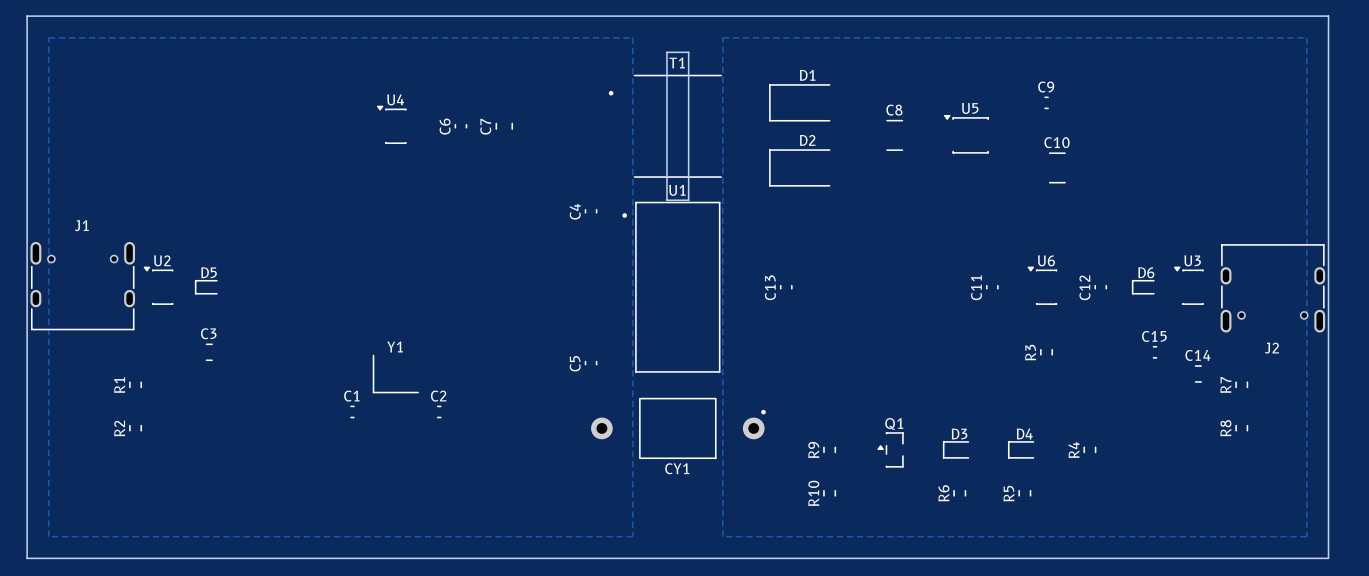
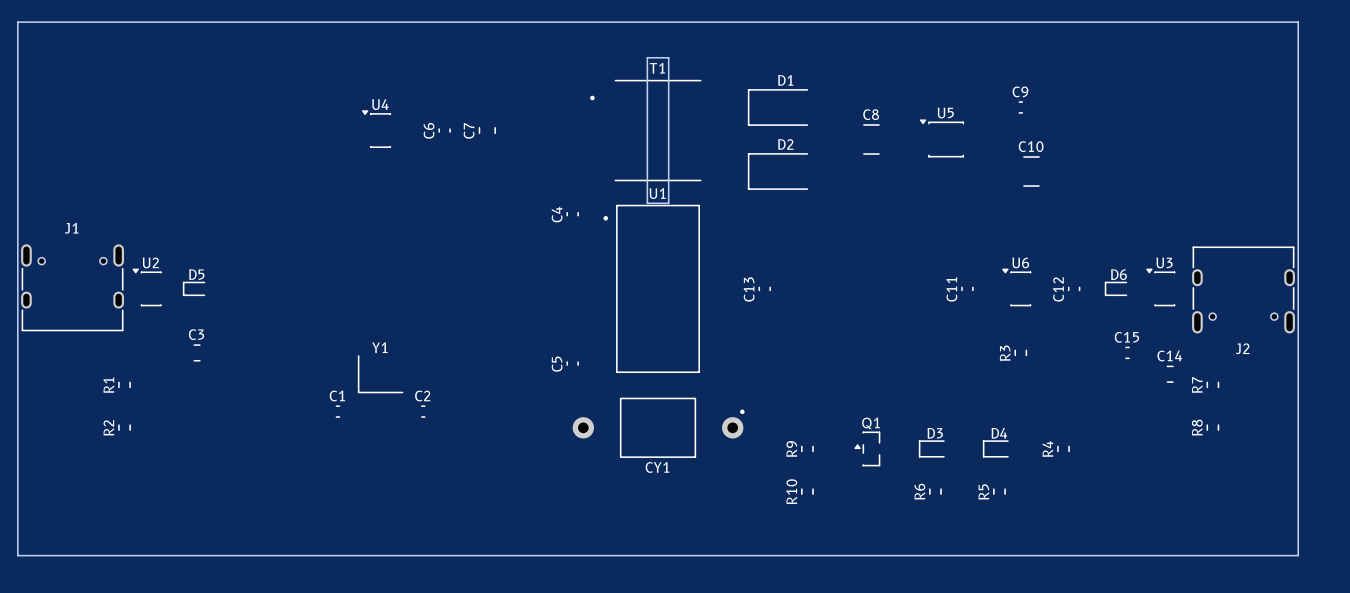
zone outline: (48, 37) (632, 37) (632, 536) (48, 536) (48, 37) -> none
zone outline: (722, 37) (1306, 37) (1306, 536) (722, 536) (722, 37) -> none

